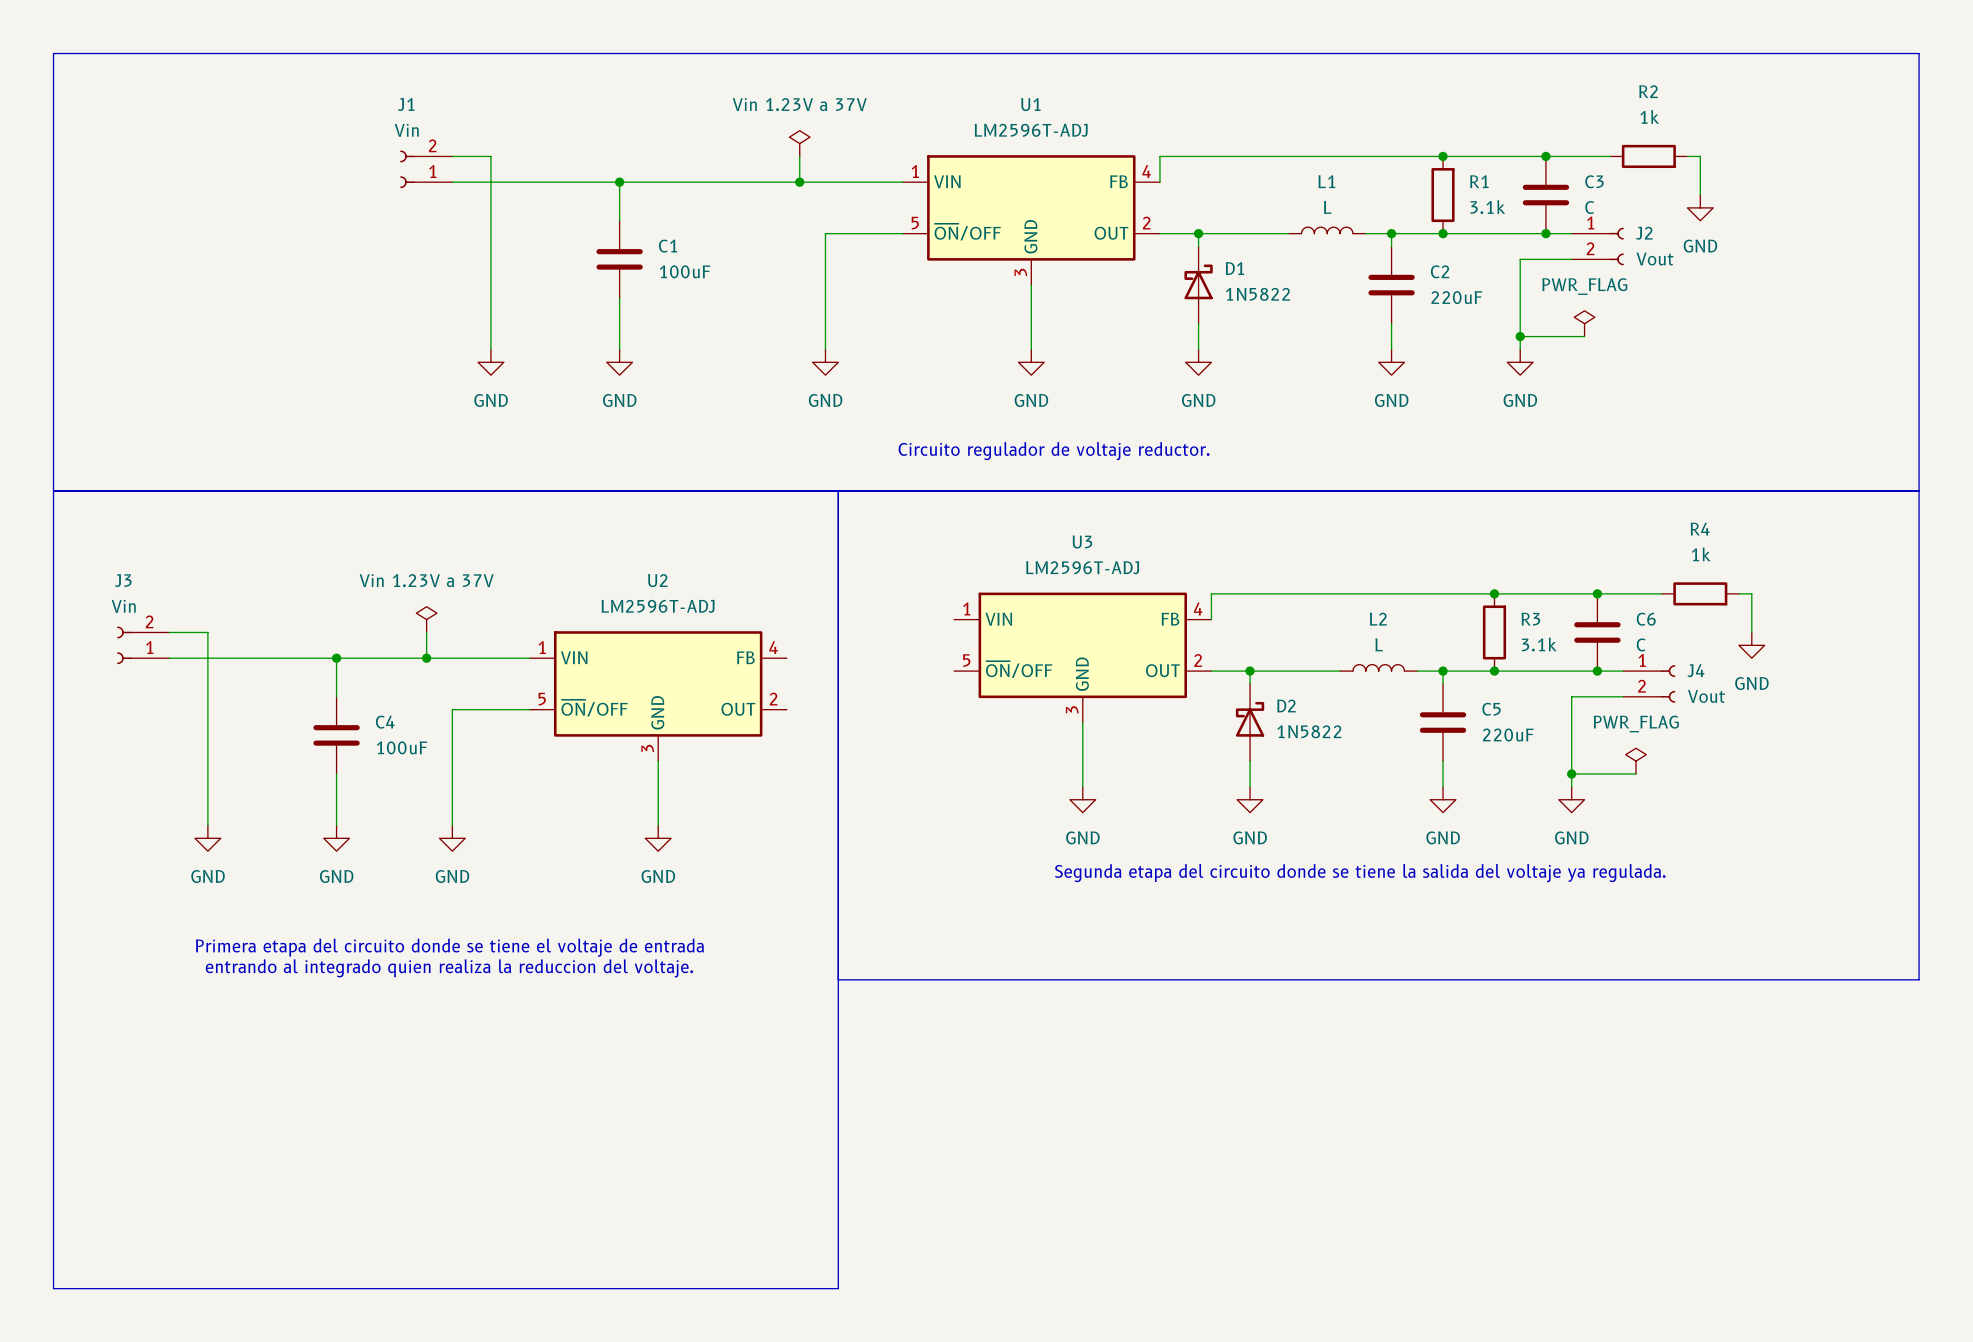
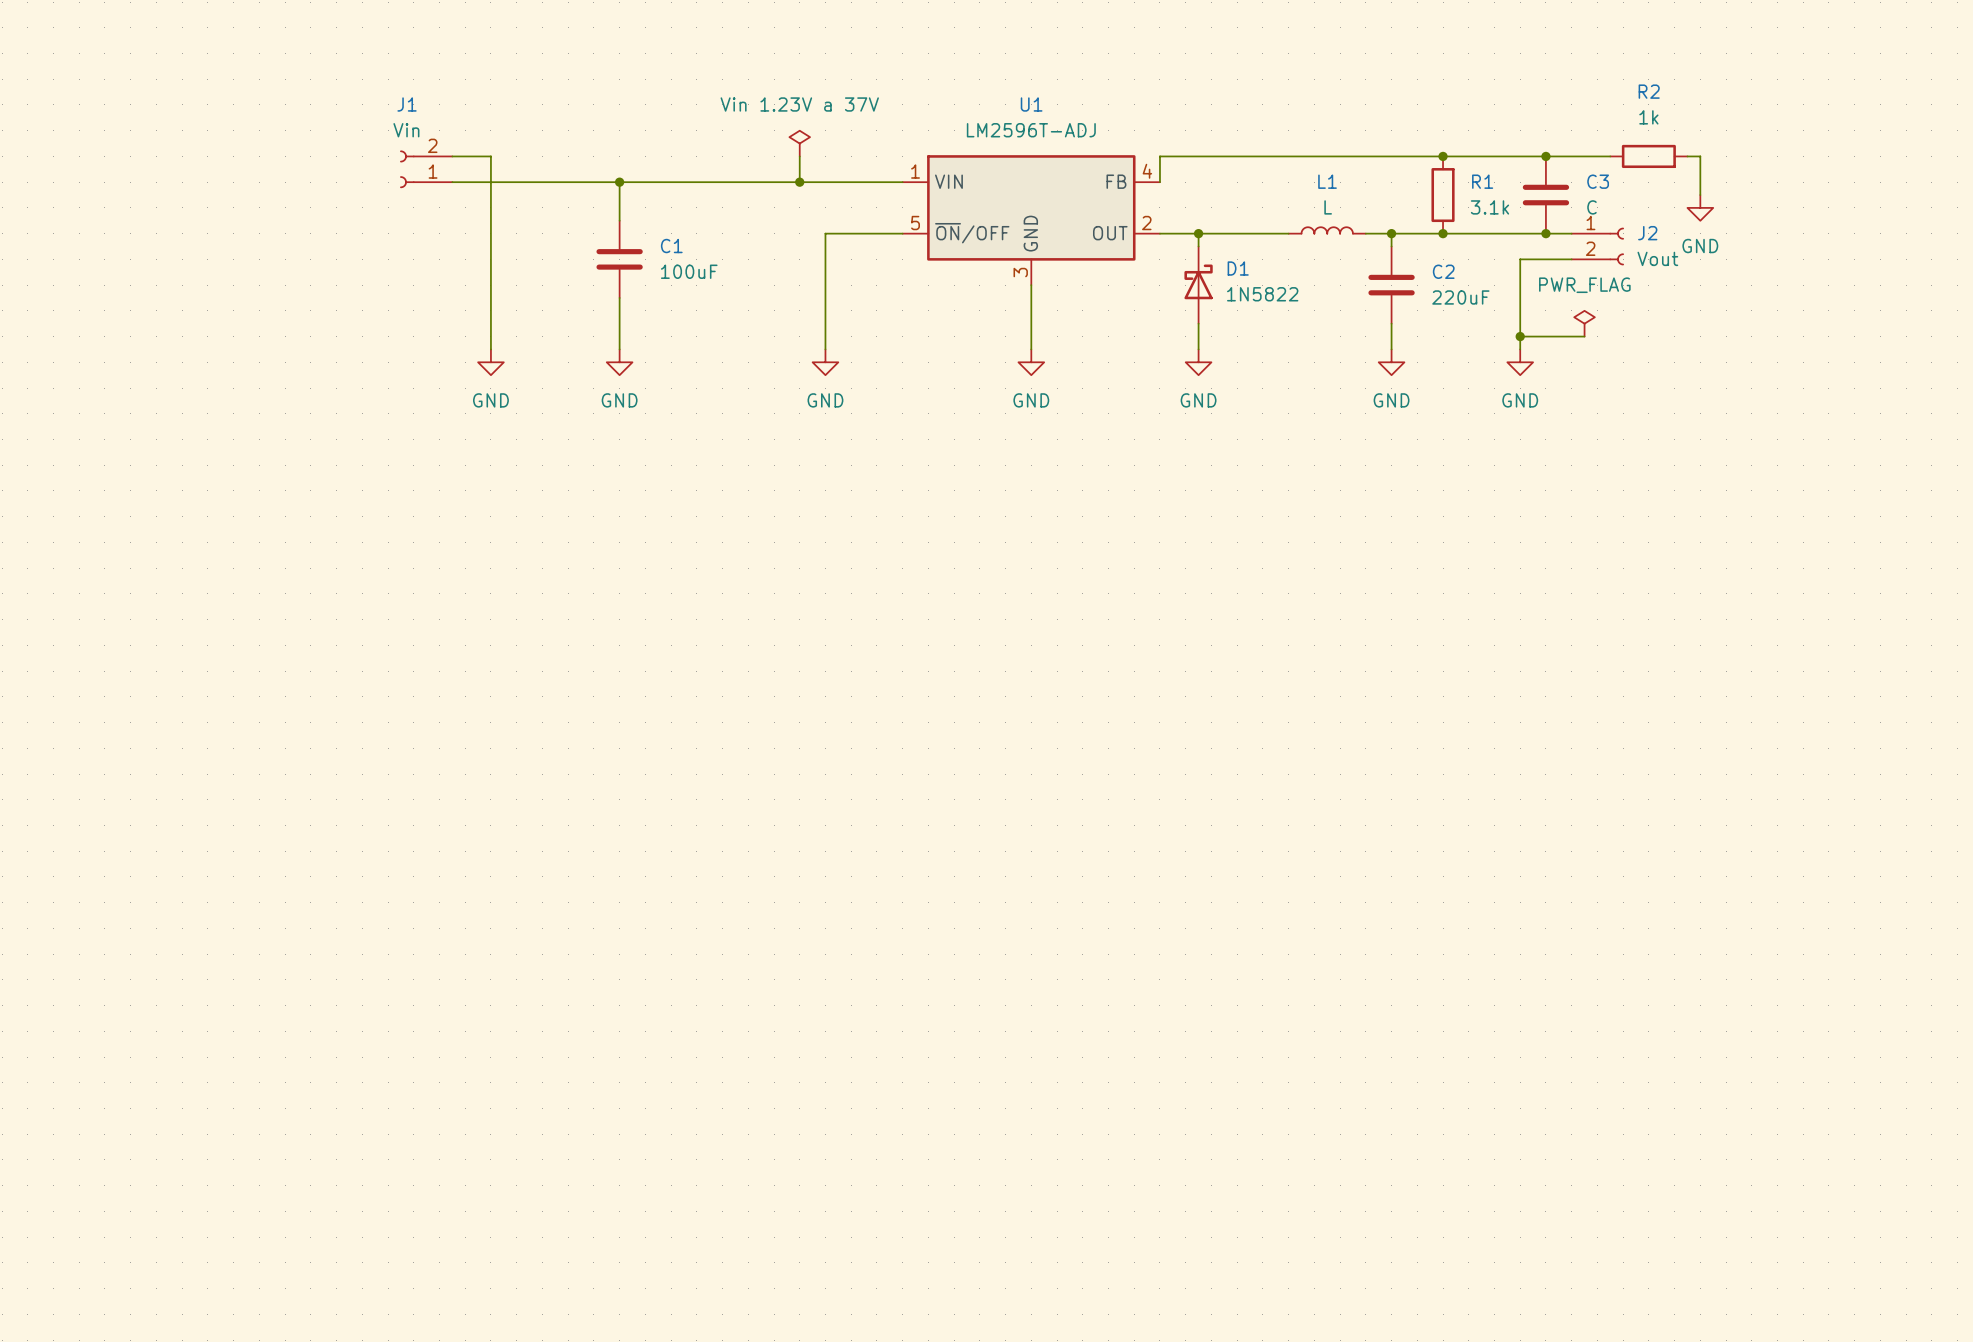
text: Circuito regulador de voltaje reductor. (1054, 451) -> none
line: (53, 490) (1919, 490) -> none
line: (838, 490) (838, 1288) (53, 1288) (53, 53) (1919, 53) (1919, 979) (838, 979) -> none
junction: (1494, 593) -> none
junction: (1597, 593) -> none
wire: (1661, 593) (1211, 593) (1211, 619) -> none
R4: 1k (1700, 593) -> none
wire: (1738, 593) (1751, 593) (1751, 632) -> none
power symbol: Vin 1.23V a 37V (426, 619) -> none
wire: (169, 632) (207, 632) (207, 825) -> none
wire: (426, 632) (426, 658) -> none
R3: 3.1k (1494, 632) -> none
C6: C (1597, 632) -> none
J3: Vin (143, 645) -> none
power symbol: GND (1751, 645) -> none
U3: LM2596T-ADJ (1082, 657) -> none
wire: (169, 658) (529, 658) -> none
wire: (336, 658) (336, 696) -> none
junction: (336, 658) -> none
junction: (426, 658) -> none
L2: L (1378, 667) -> none
wire: (1211, 671) (1340, 671) -> none
wire: (1250, 671) (1250, 683) -> none
junction: (1250, 671) -> none
wire: (1417, 671) (1623, 671) -> none
wire: (1443, 671) (1443, 683) -> none
junction: (1443, 671) -> none
junction: (1494, 671) -> none
junction: (1597, 671) -> none
J4: Vout (1649, 683) -> none
U2: LM2596T-ADJ (658, 696) -> none
wire: (1623, 696) (1571, 696) (1571, 786) -> none
wire: (529, 709) (452, 709) (452, 825) -> none
wire: (1082, 722) (1082, 786) -> none
D2: 1N5822 (1250, 722) -> none
C5: 220uF (1443, 722) -> none
C4: 100uF (336, 735) -> none
wire: (658, 761) (658, 825) -> none
wire: (1250, 761) (1250, 786) -> none
wire: (1443, 761) (1443, 786) -> none
power symbol: PWR_FLAG (1636, 761) -> none
wire: (336, 774) (336, 825) -> none
wire: (1571, 774) (1636, 774) -> none
junction: (1571, 774) -> none
power symbol: GND (1082, 799) -> none
power symbol: GND (1250, 799) -> none
power symbol: GND (1443, 799) -> none
power symbol: GND (1571, 799) -> none
power symbol: GND (207, 838) -> none
power symbol: GND (336, 838) -> none
power symbol: GND (452, 838) -> none
power symbol: GND (658, 838) -> none
text: Segunda etapa del circuito donde se tiene la salida del voltaje ya regulada. (1360, 873) -> none
text: Primera etapa del circuito donde se tiene el voltaje de entrada (449, 947) -> none
text: entrando al integrado quien realiza la reduccion del voltaje. (449, 968) -> none

